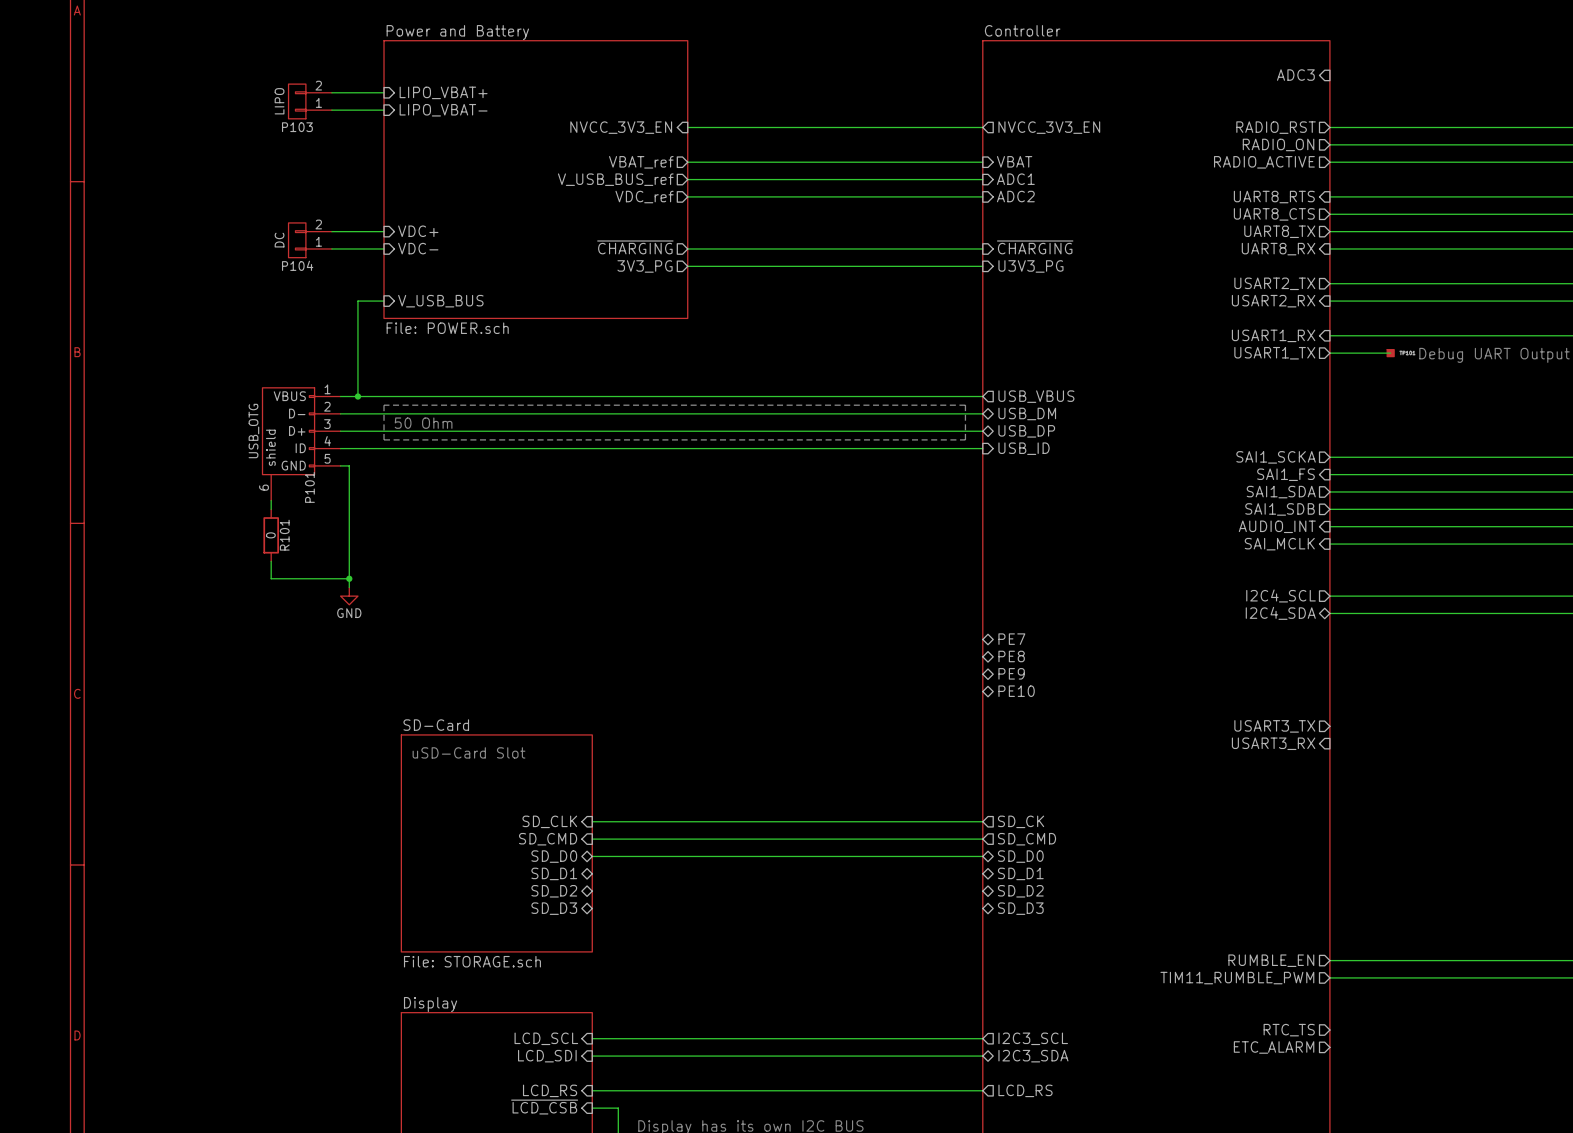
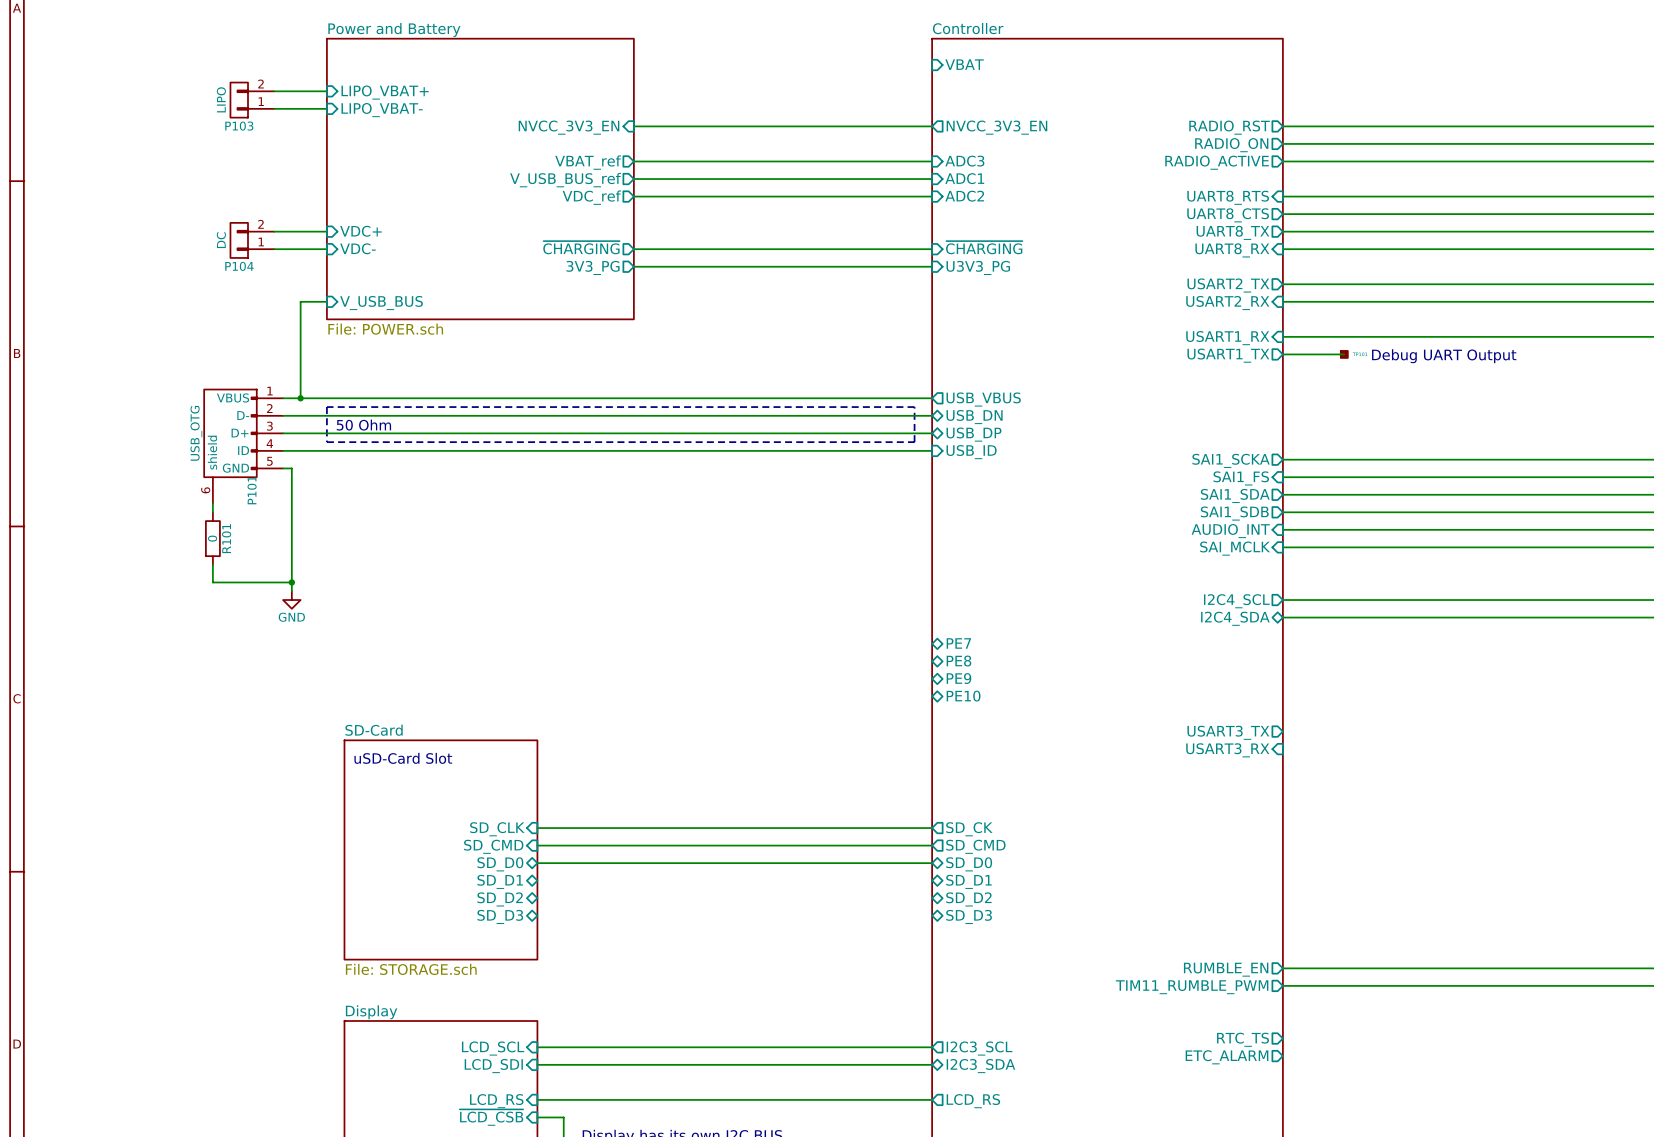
sheet pin: none -> VBAT (964, 64)
sheet pin: ADC3 (1295, 75) -> none
sheet pin: VBAT (1014, 161) -> ADC3 (964, 161)
sheet pin: USB_DM (1027, 413) -> USB_DN (974, 417)

